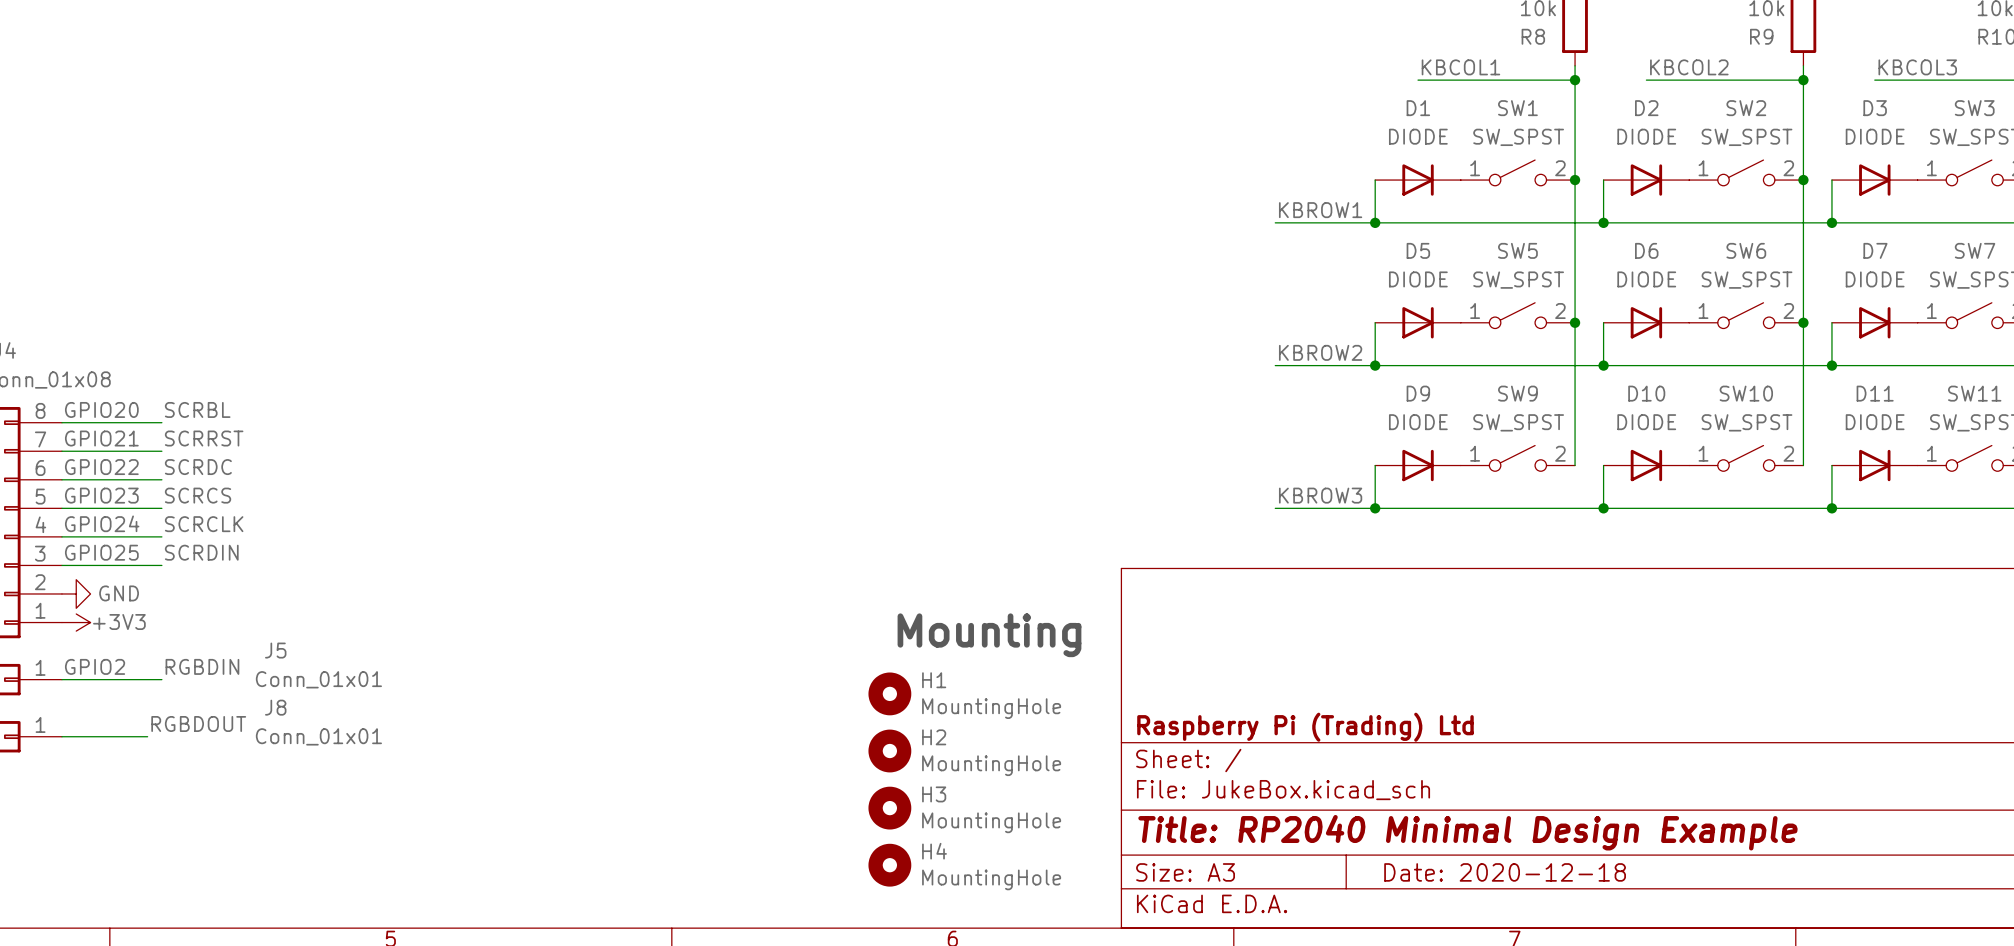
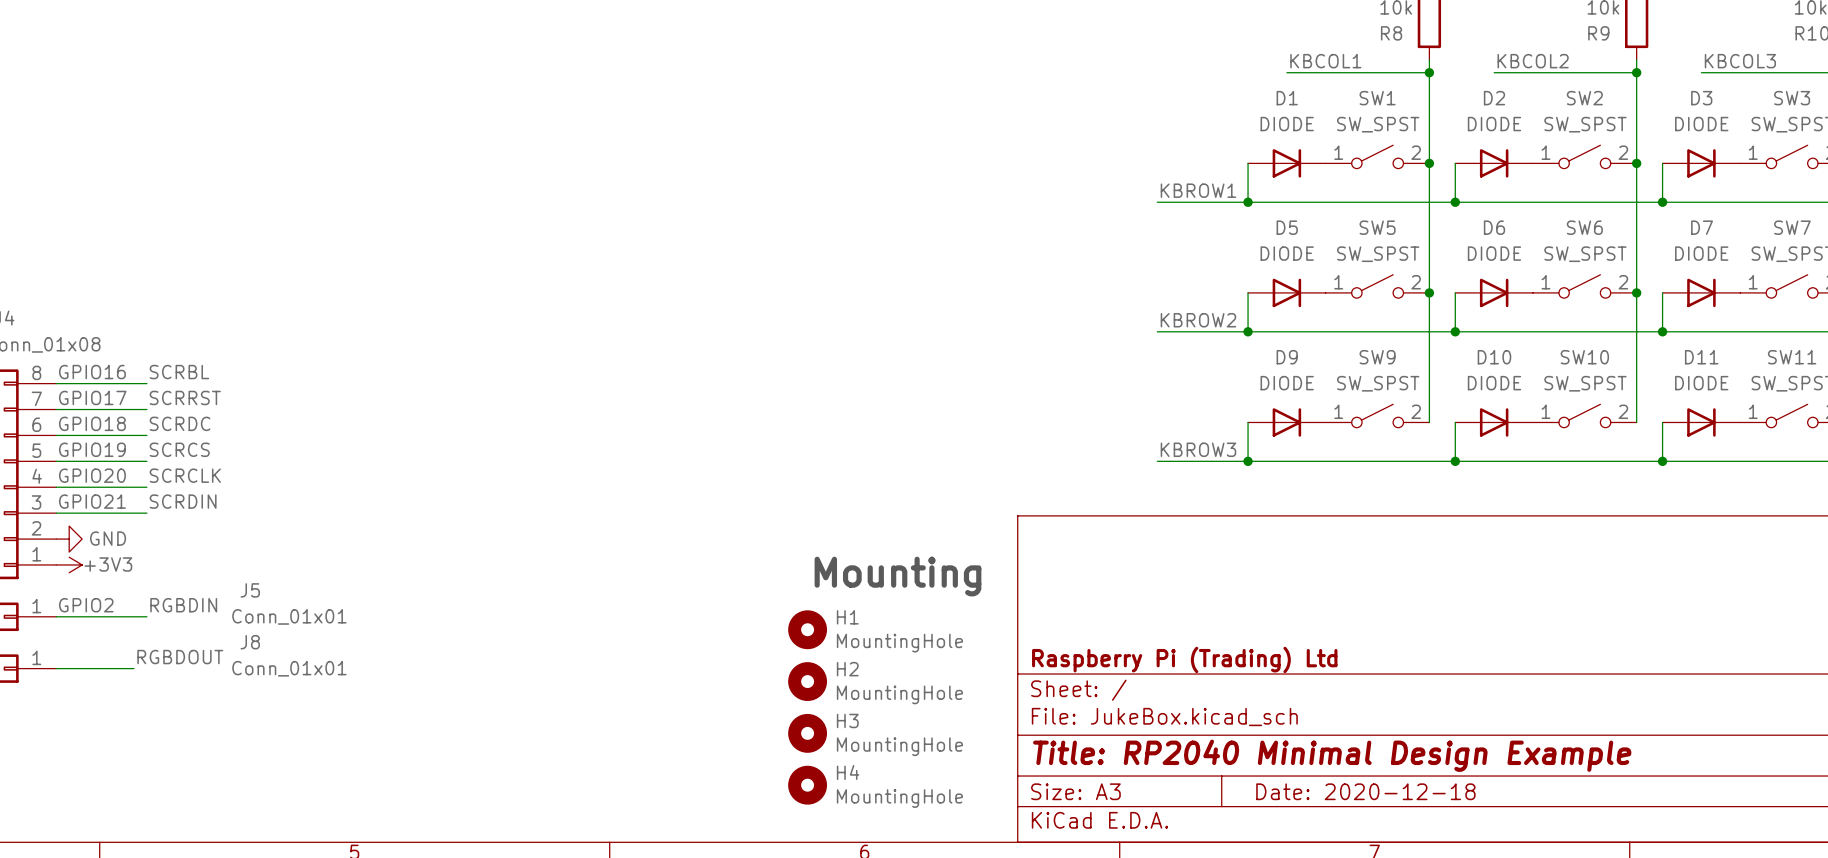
label: GPIO20 (101, 409) -> GPIO16 (92, 372)
label: GPIO21 (101, 438) -> GPIO17 (92, 397)
label: GPIO22 (101, 467) -> GPIO18 (92, 423)
label: GPIO23 (101, 495) -> GPIO19 (92, 449)
label: GPIO24 (102, 523) -> GPIO20 (92, 475)
label: GPIO25 (101, 552) -> GPIO21 (92, 501)

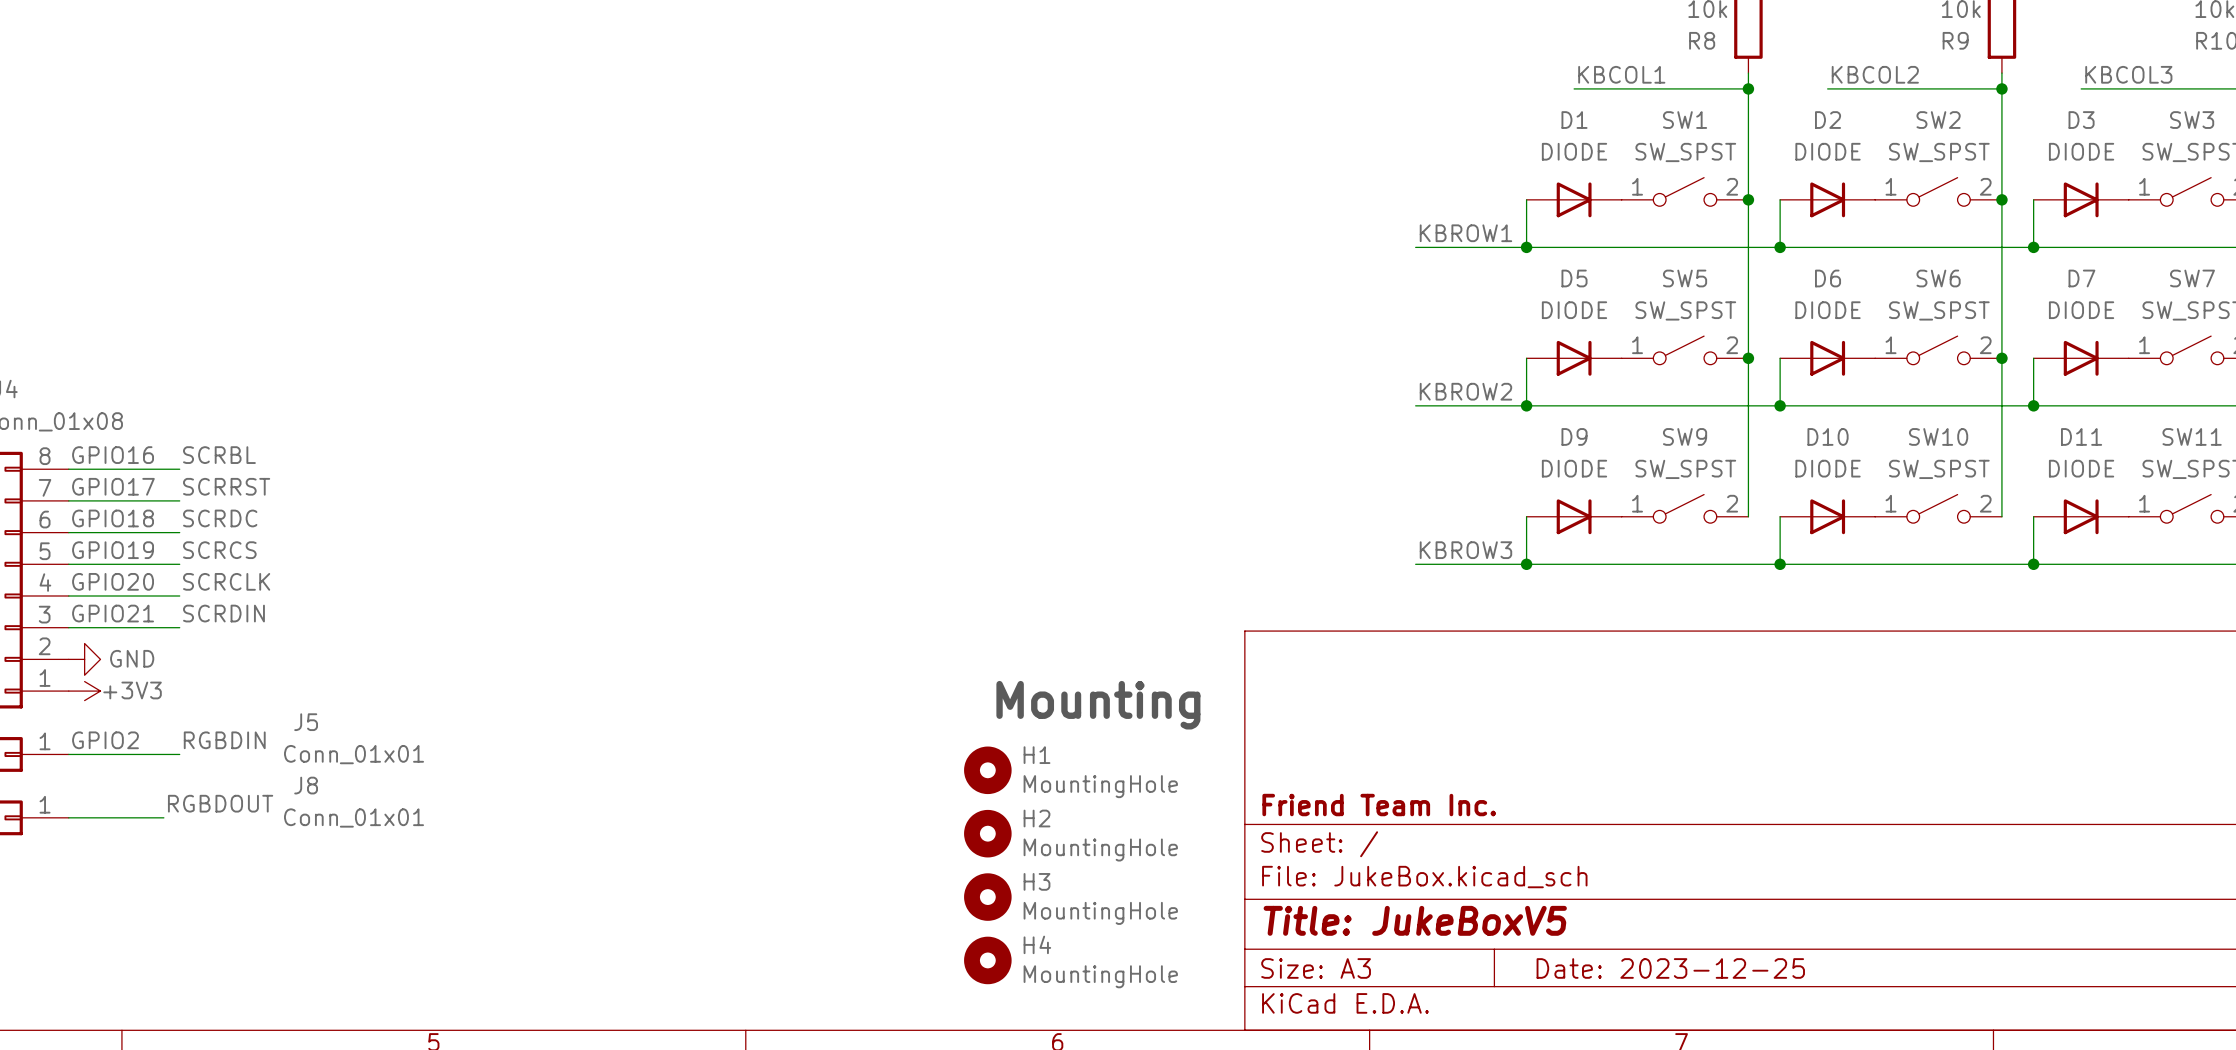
title block: Raspberry Pi (Trading) Ltd (1184, 659) -> Friend Team Inc. (1379, 805)
title block: Title: RP2040 Minimal Design Example (1332, 755) -> Title: JukeBoxV5 (1415, 920)
title block: Date: 2020-12-18 (1365, 791) -> Date: 2023-12-25 (1670, 968)

